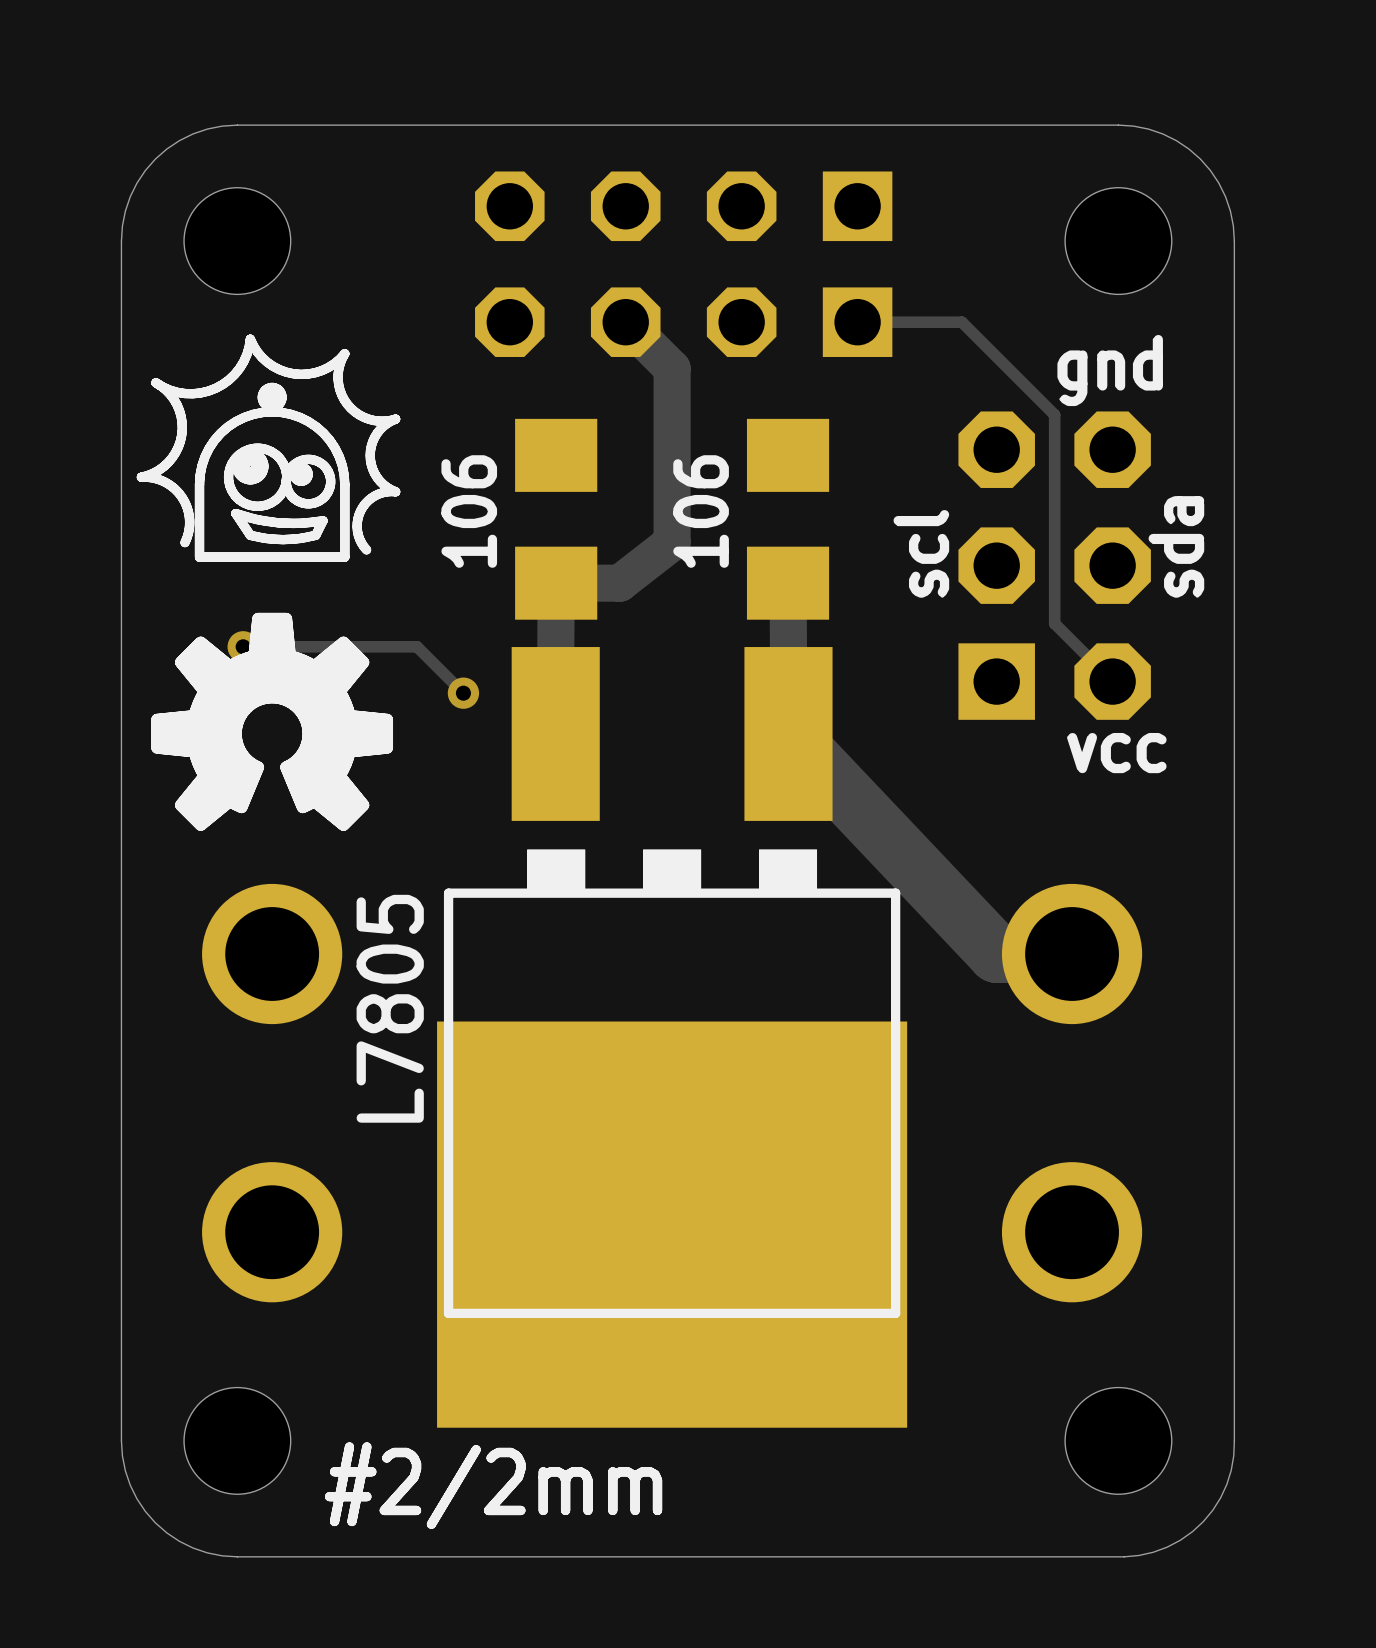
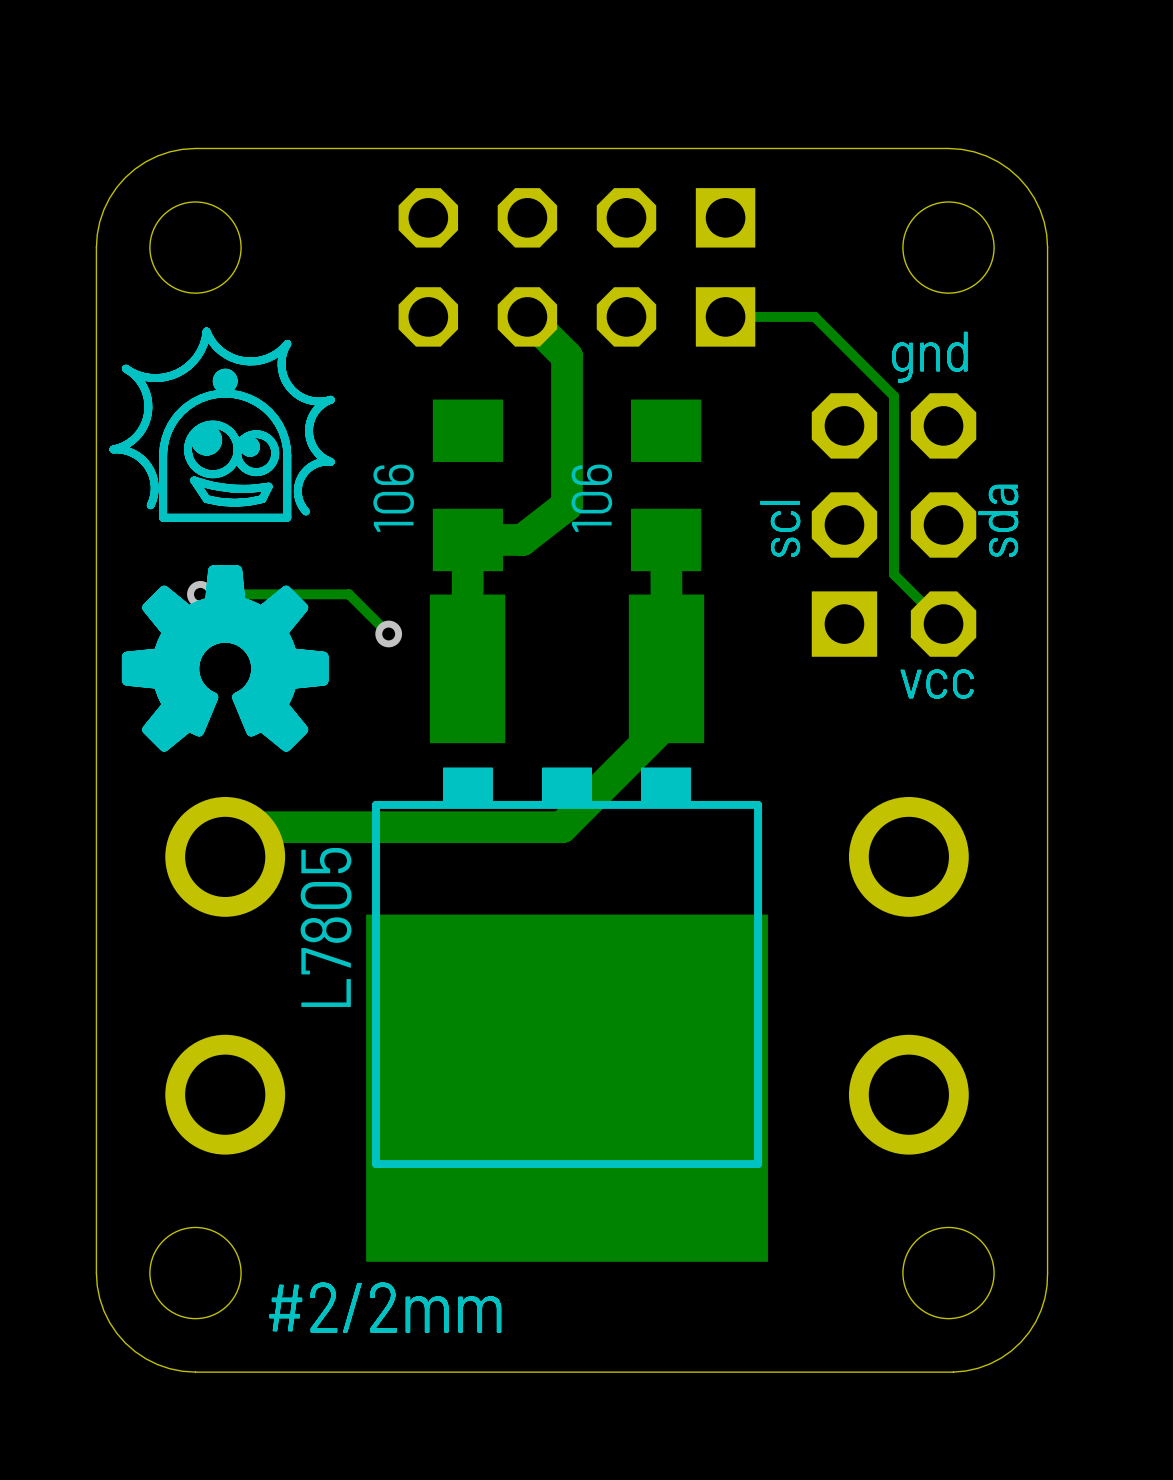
track: (788, 733) (996, 954) (1072, 954) -> (666, 668) (666, 722) (562, 827) (254, 827) (225, 856)

